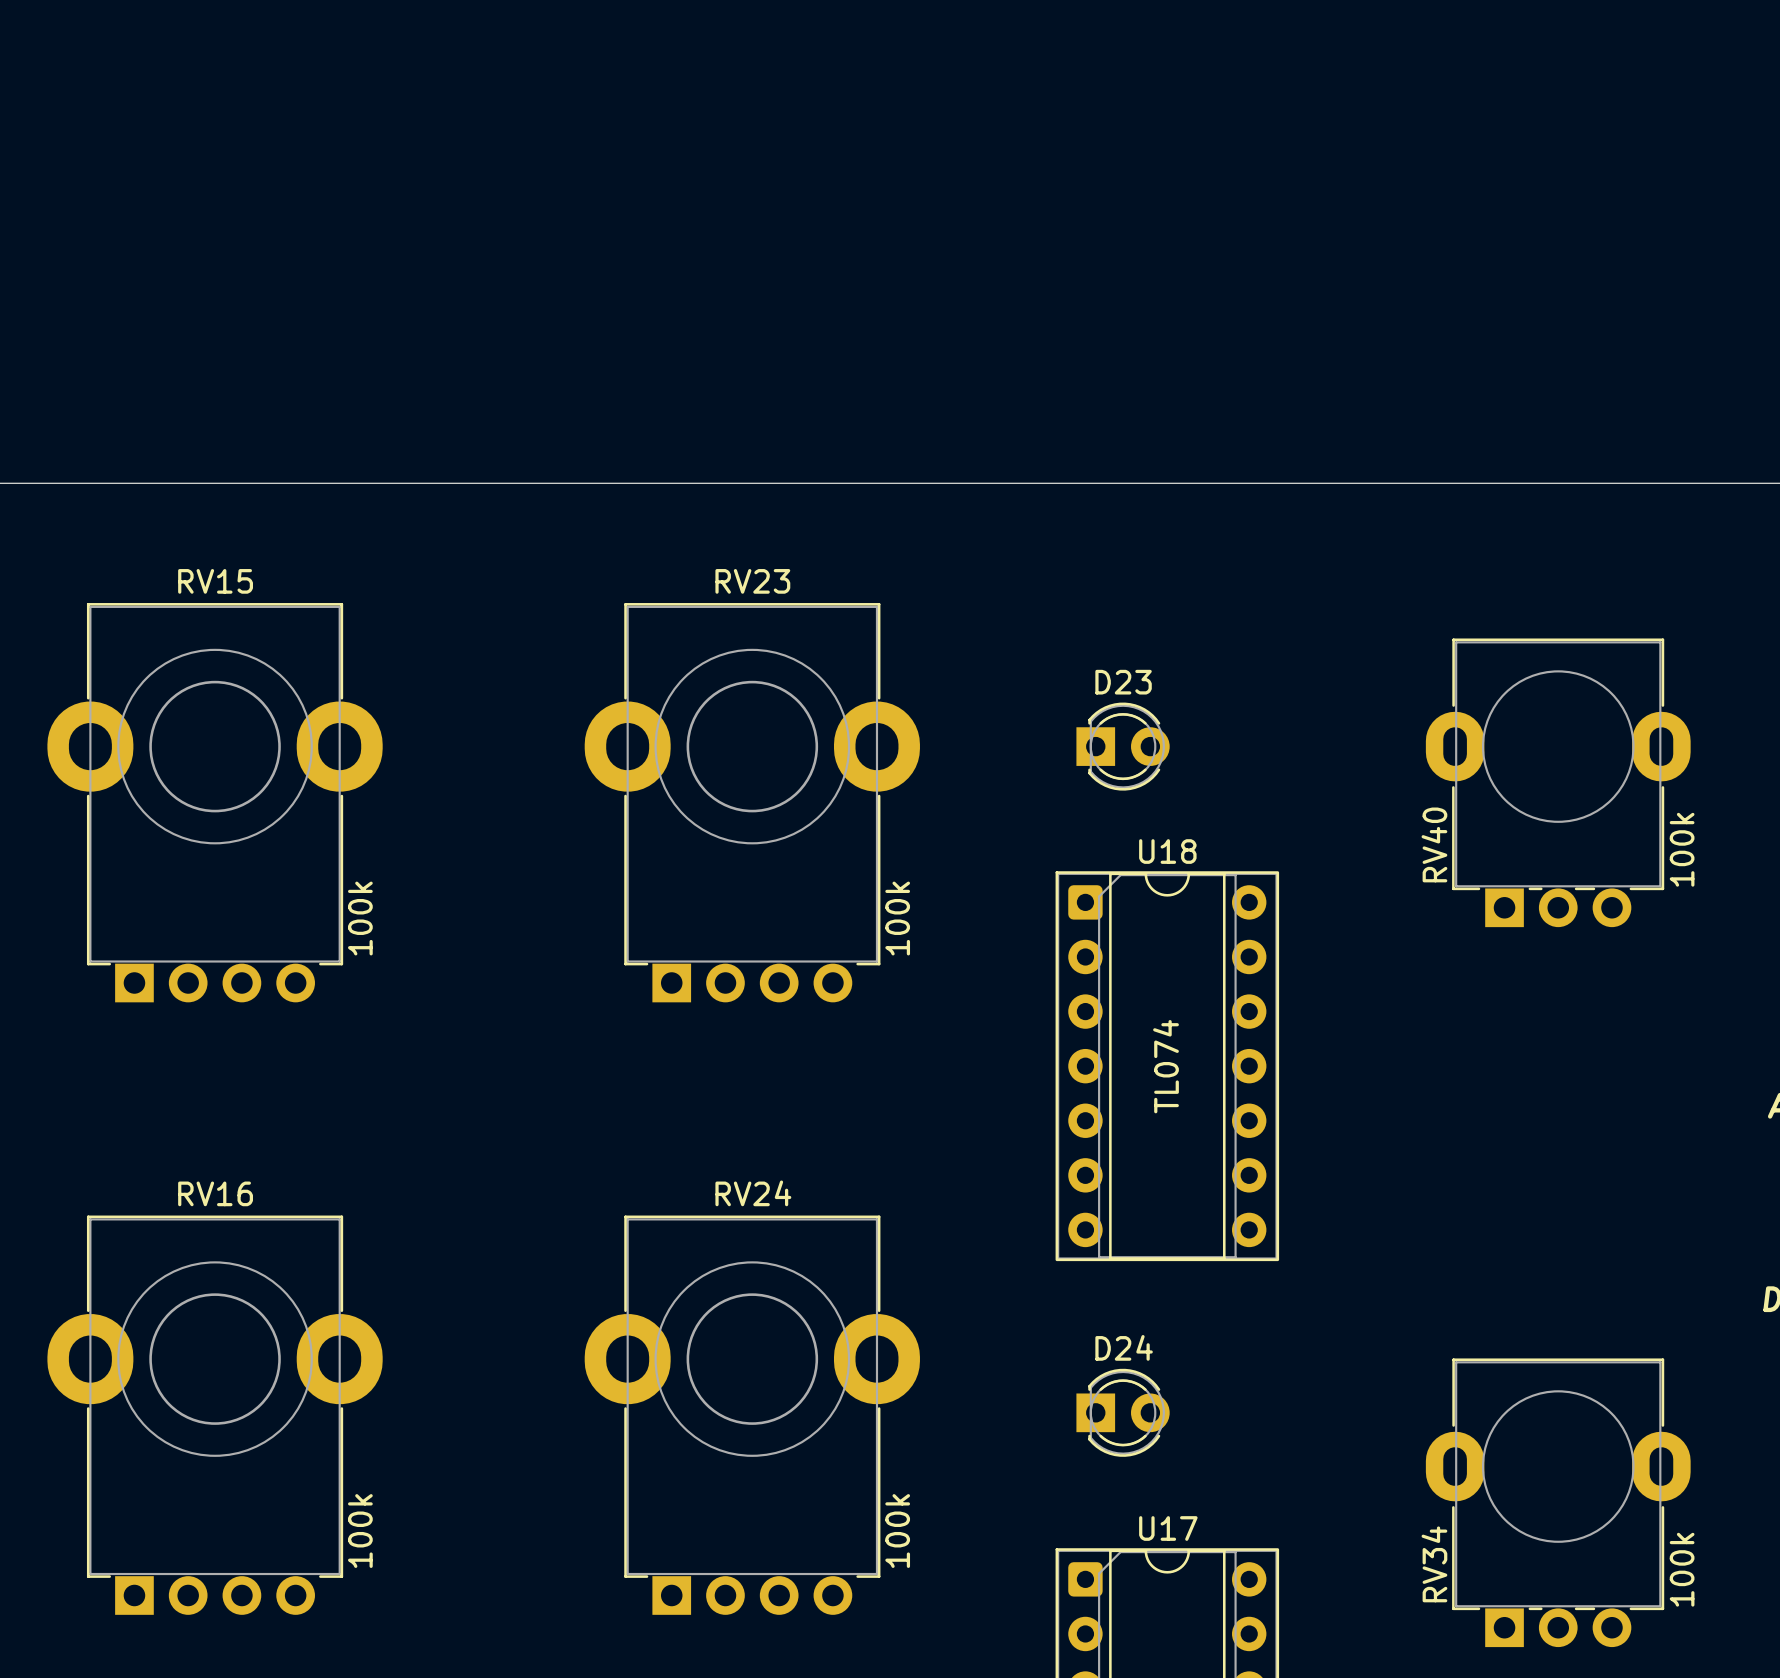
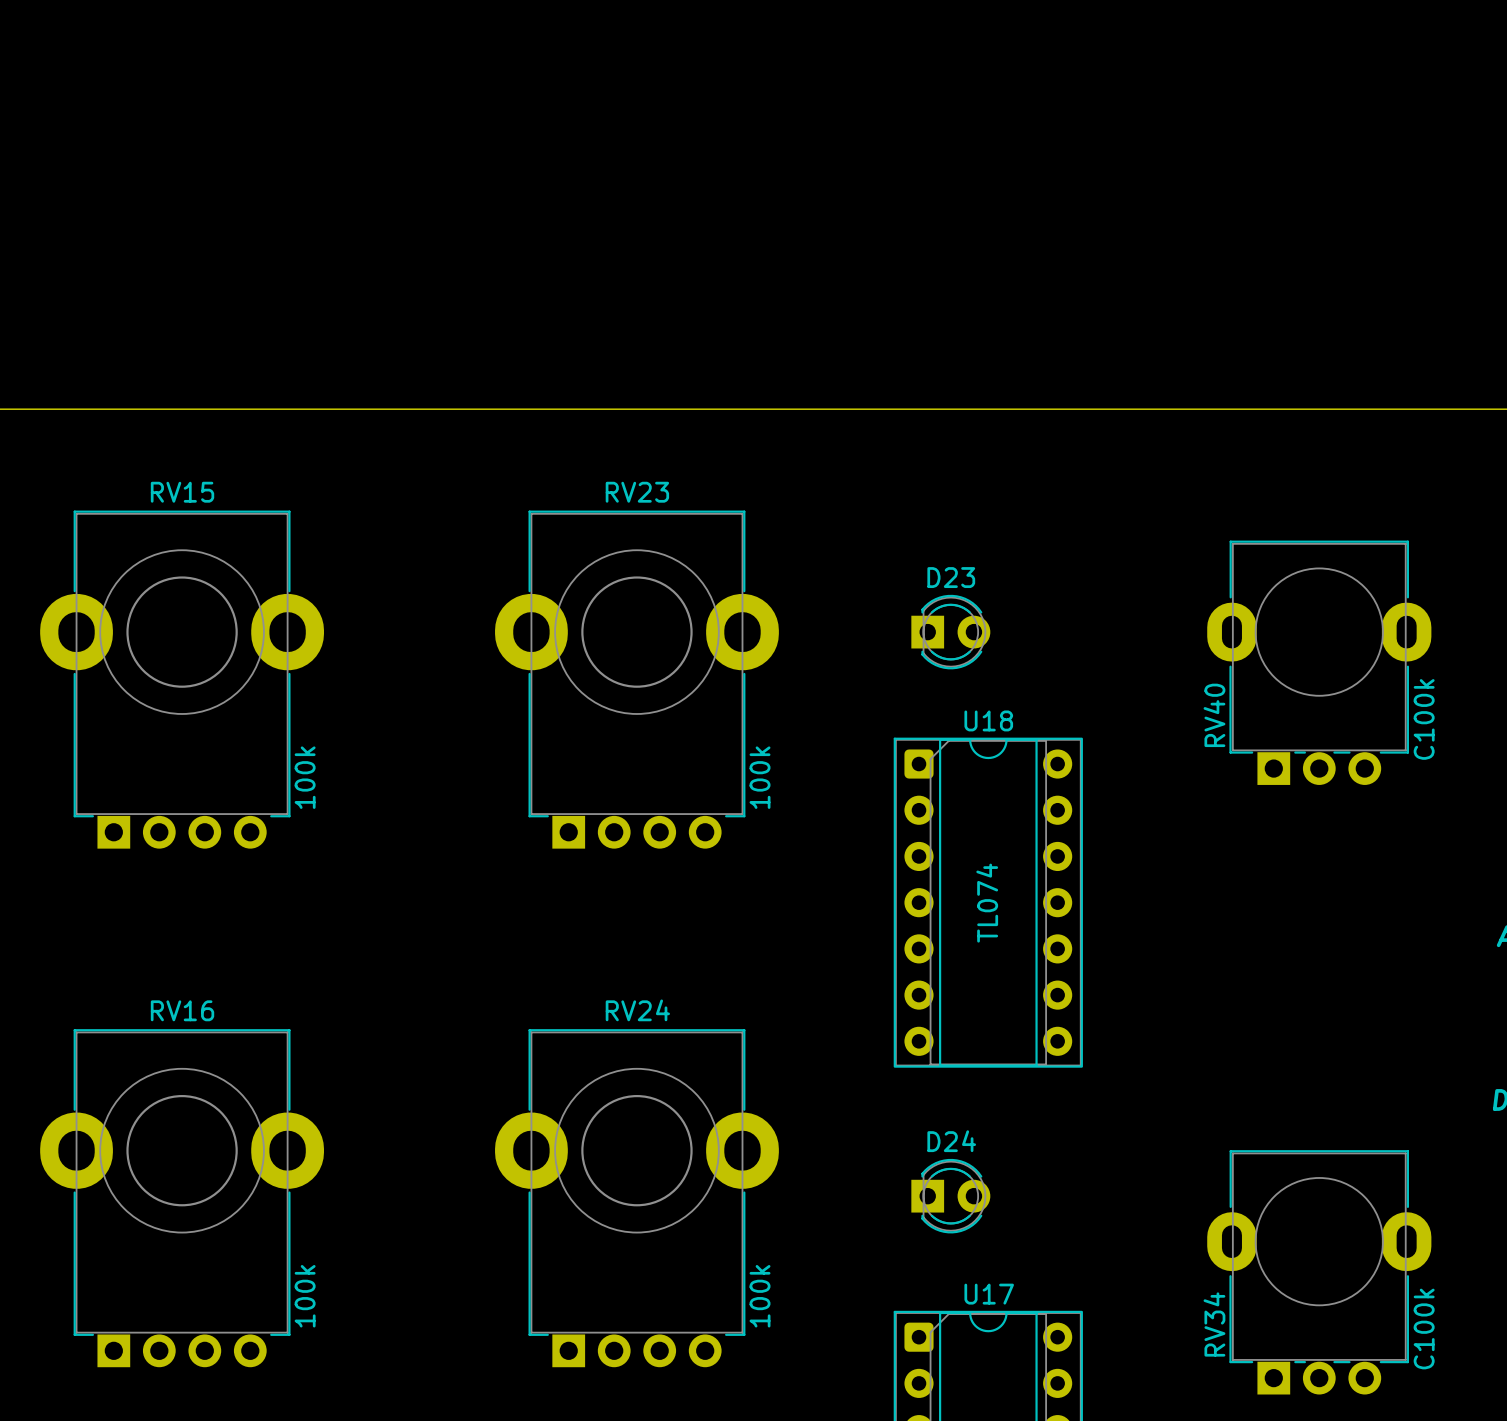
RV40 value: 100k (1682, 849) -> C100k (1424, 719)
RV34 value: 100k (1682, 1569) -> C100k (1424, 1328)

